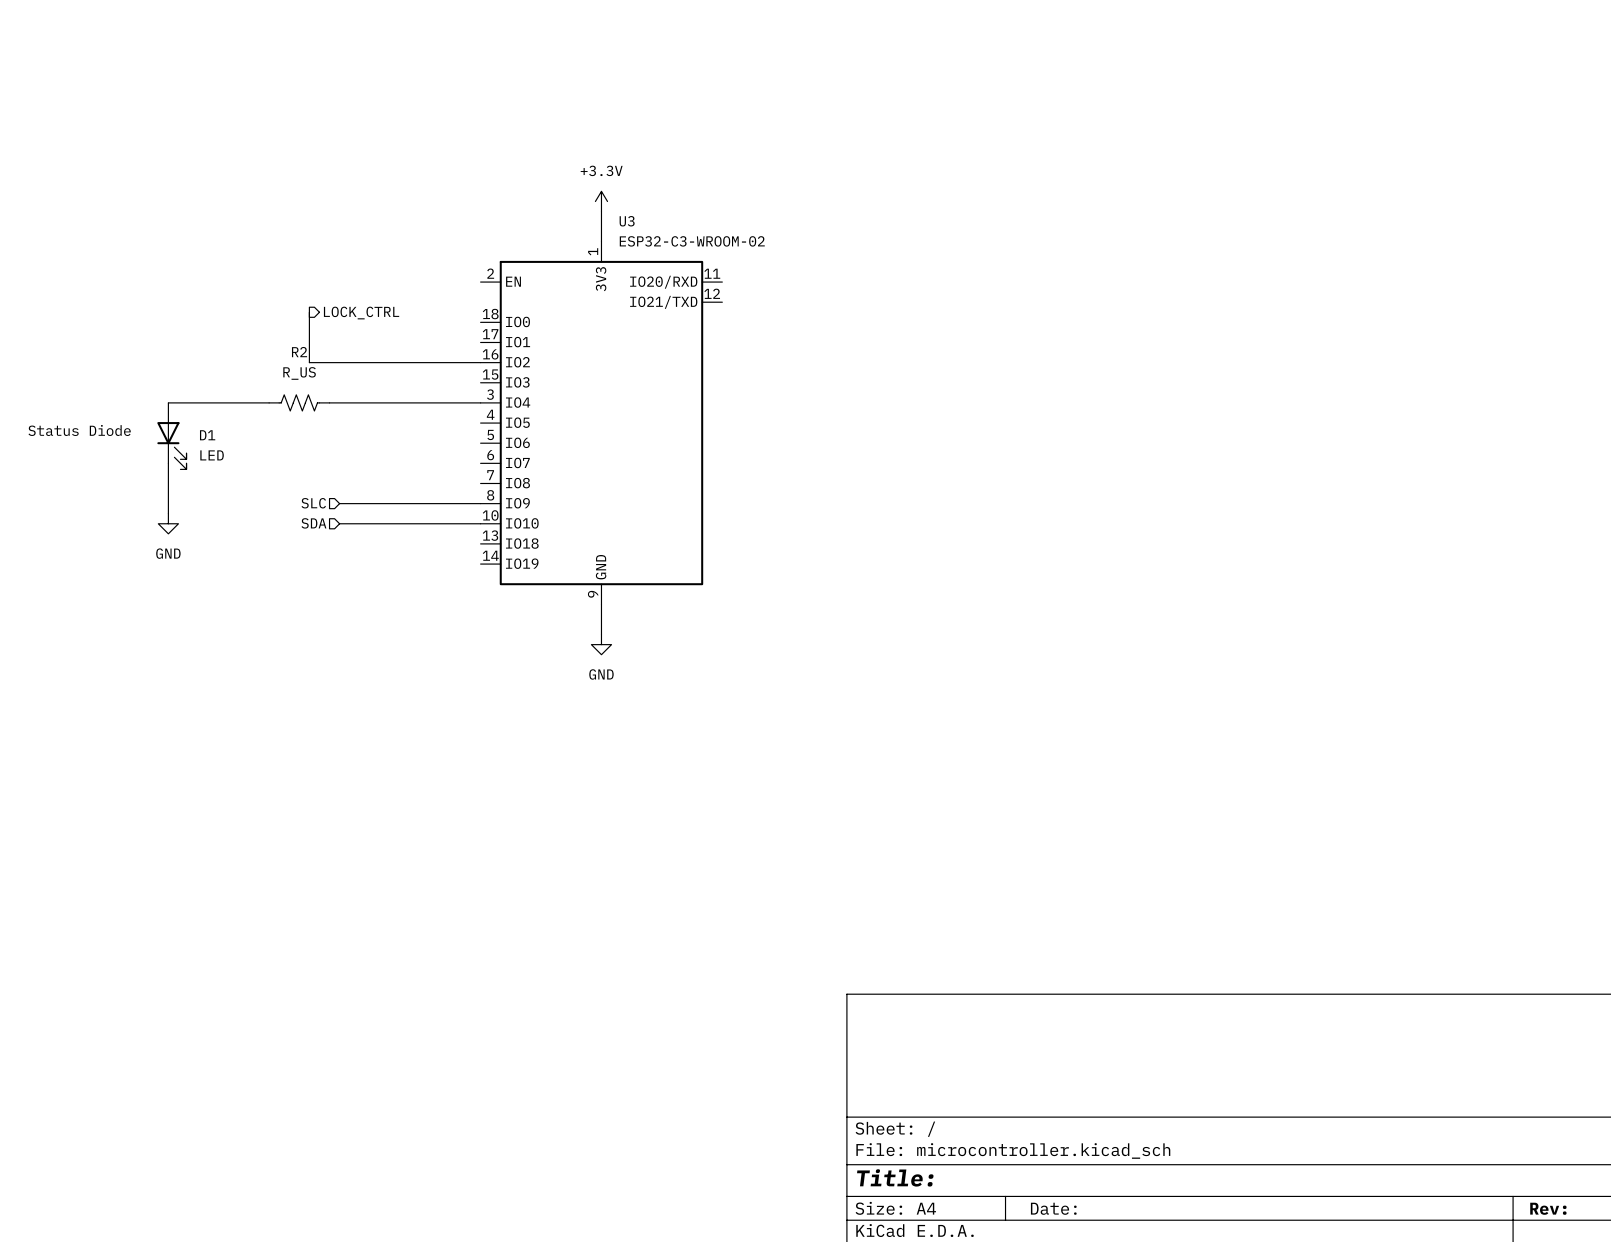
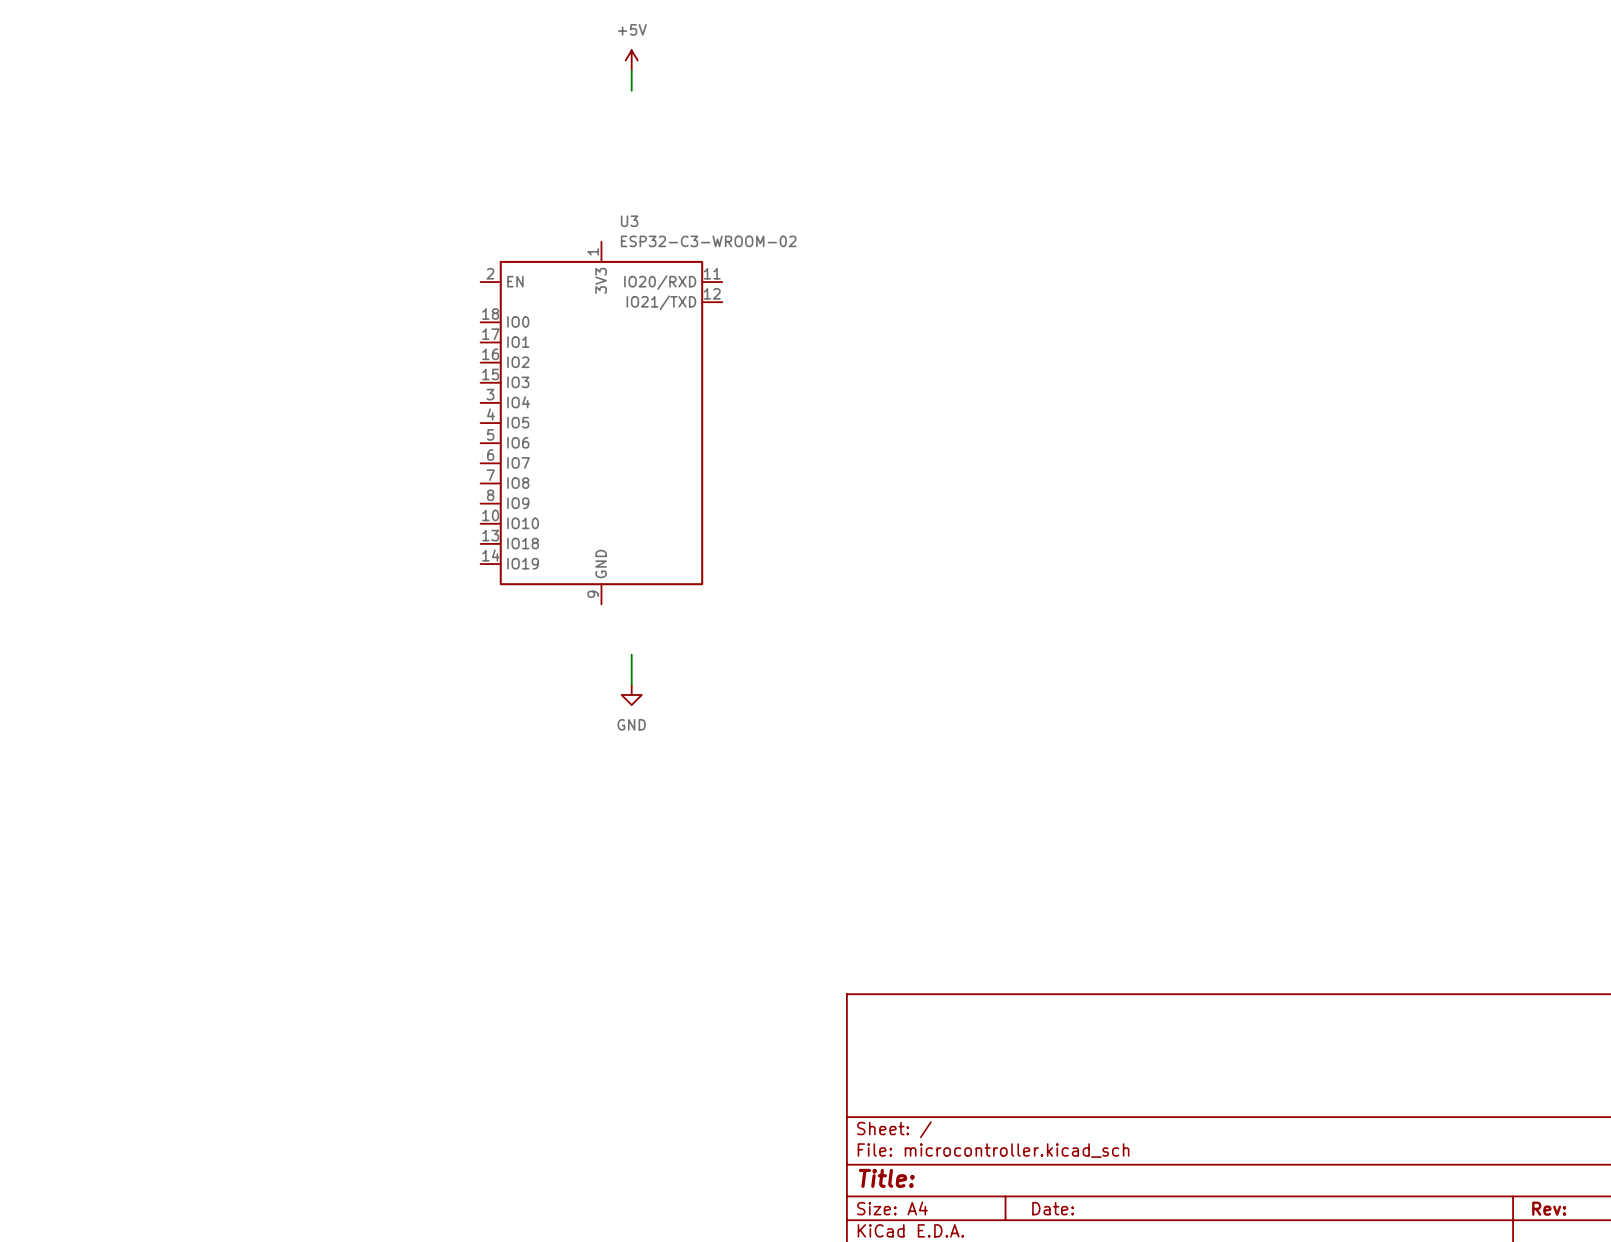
power symbol: none -> +5V (631, 60)
wire: none -> (631, 70) (631, 90)
power symbol: +3.3V (601, 201) -> none
wire: (601, 211) (601, 241) -> none
wire: (309, 312) (309, 362) (480, 362) -> none
hierarchical label: LOCK_CTRL (361, 313) -> none
wire: (168, 402) (269, 402) -> none
R2: R_US (299, 402) -> none
wire: (329, 402) (480, 402) -> none
text: Status Diode (79, 430) -> none
D1: LED (171, 436) -> none
wire: (168, 463) (168, 513) -> none
hierarchical label: SLC (313, 503) -> none
wire: (339, 503) (480, 503) -> none
power symbol: GND (168, 523) -> none
hierarchical label: SDA (313, 523) -> none
wire: (339, 523) (480, 523) -> none
wire: (601, 604) (601, 634) -> (631, 654) (631, 684)
power symbol position: GND (601, 644) -> GND (631, 694)

